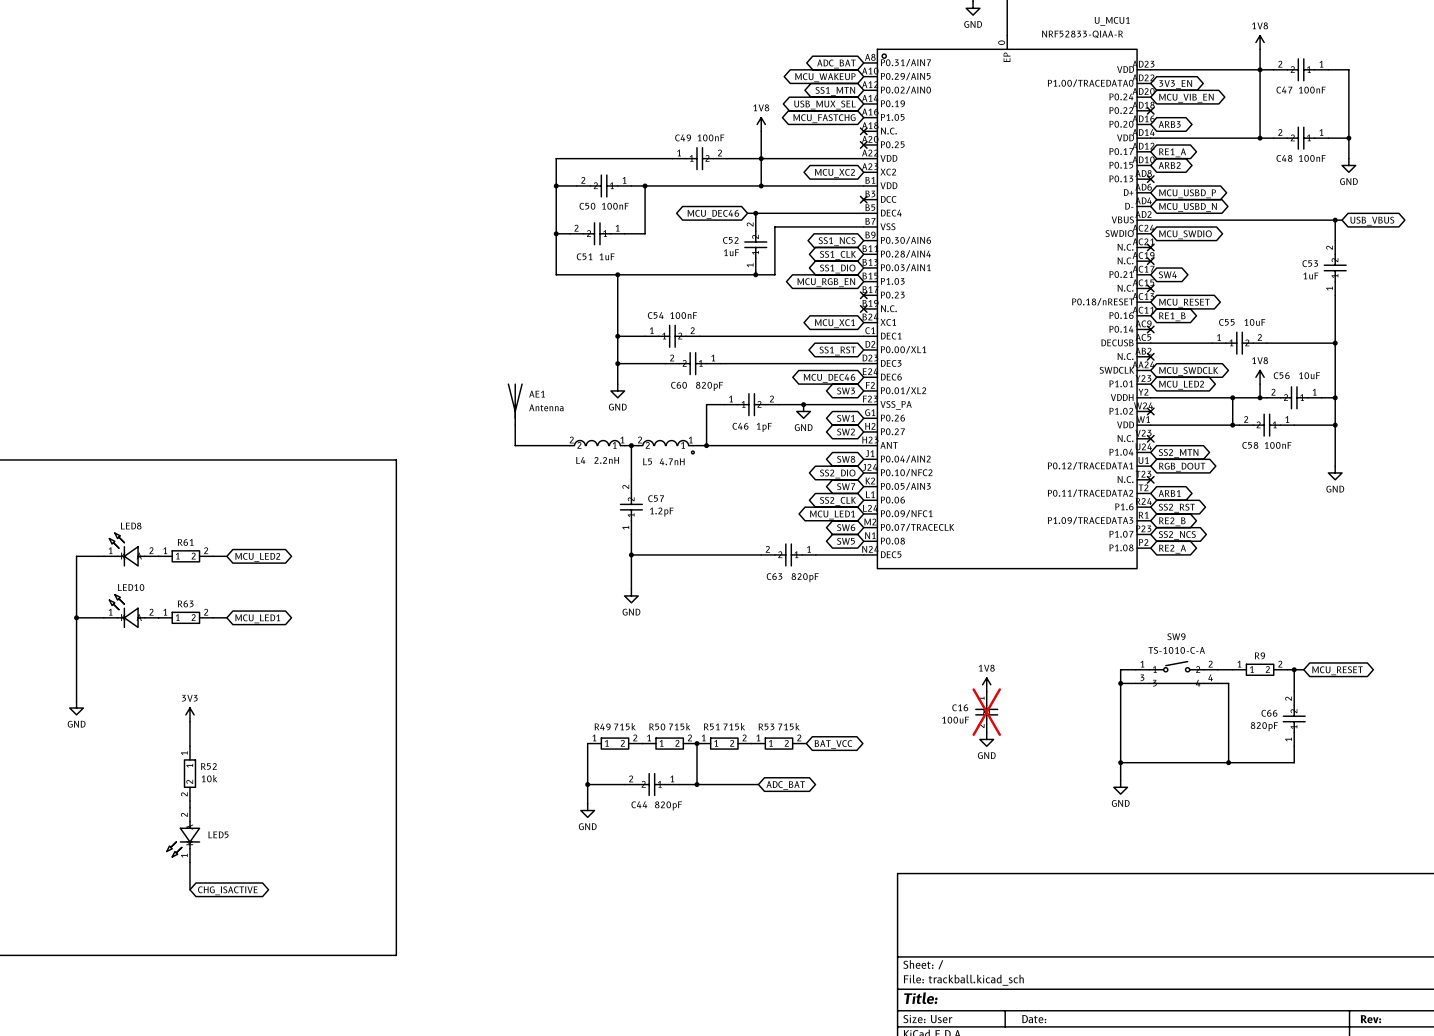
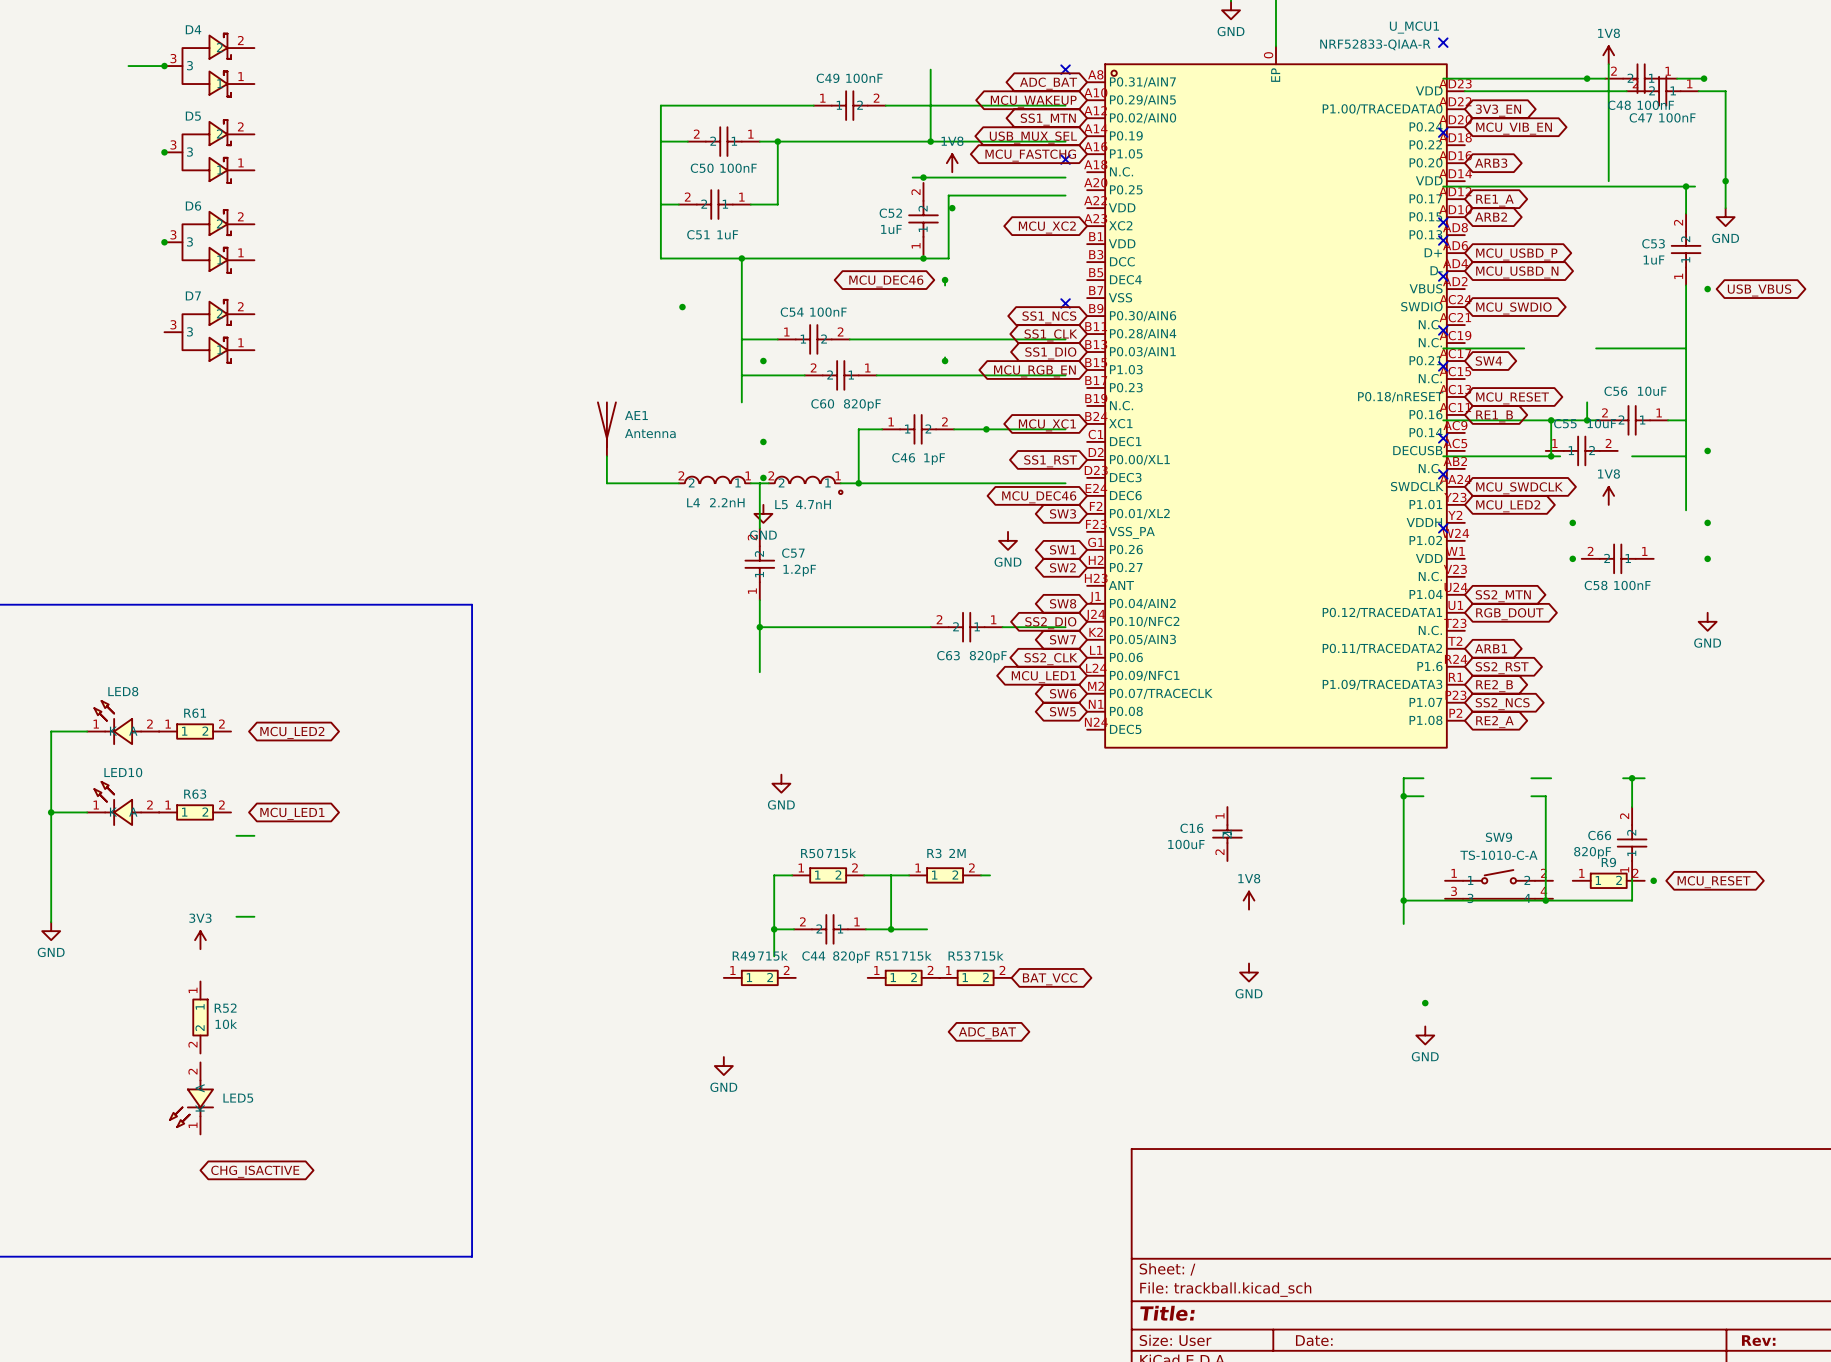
no-connect mark: none -> (1443, 42)
D4: none -> (209, 65)
wire: none -> (128, 66) (164, 66)
junction: none -> (164, 66)
no-connect mark: none -> (1065, 69)
junction: none -> (1704, 78)
junction position: (1260, 69) -> (1587, 78)
junction: none -> (777, 141)
junction: none -> (930, 141)
no-connect mark position: (1150, 110) -> (1443, 132)
D5: none -> (209, 151)
junction: none -> (164, 152)
no-connect mark: none -> (1065, 159)
wire: (761, 131) (761, 185) -> (930, 69) (930, 141)
no-connect mark: (863, 131) -> none
junction: none -> (923, 177)
wire: (1150, 138) (1273, 138) -> (1443, 78) (1605, 78)
junction: (1260, 138) -> none
C48 position: (1301, 138) -> (1641, 78)
wire: (1328, 138) (1348, 138) -> (1677, 78) (1704, 78)
junction: none -> (1686, 186)
no-connect mark: (863, 144) -> none
wire: (672, 158) (556, 158) (556, 274) (774, 274) (774, 226) (863, 226) -> (813, 105) (660, 105) (660, 258) (948, 258) (948, 195) (1065, 195)
C49 position: (699, 158) -> (849, 105)
wire: (727, 158) (863, 158) -> (885, 105) (1065, 105)
no-connect mark: none -> (1443, 222)
no-connect mark: (1150, 179) -> none
D6: none -> (209, 241)
no-connect mark: none -> (1443, 240)
junction: none -> (164, 242)
wire: (556, 185) (576, 185) -> (660, 141) (687, 141)
junction: (556, 185) -> none
C50 position: (604, 185) -> (723, 141)
wire: (631, 185) (863, 185) -> (759, 141) (1065, 141)
wire: (645, 185) (645, 233) (624, 233) -> (777, 141) (777, 204) (750, 204)
junction: (645, 185) -> none
junction position: (761, 185) -> (923, 258)
junction: none -> (741, 258)
no-connect mark: (863, 199) -> none
no-connect mark: none -> (1443, 276)
wire: (747, 213) (863, 213) -> (912, 177) (1065, 177)
wire: (1150, 220) (1342, 220) -> (1443, 186) (1695, 186)
wire: (1335, 220) (1335, 240) -> (1686, 186) (1686, 213)
no-connect mark: none -> (1065, 303)
wire: (556, 233) (569, 233) -> (660, 204) (678, 204)
C51 position: (597, 233) -> (714, 204)
C52 position: (755, 244) -> (923, 218)
no-connect mark: (1150, 247) -> none
no-connect mark: none -> (1443, 330)
D7: none -> (209, 331)
no-connect mark: (1150, 261) -> none
C53 position: (1335, 267) -> (1686, 249)
wire: (617, 274) (617, 384) -> (741, 258) (741, 402)
no-connect mark: none -> (1443, 366)
no-connect mark: (1150, 288) -> none
no-connect mark: (863, 295) -> none
wire: (1335, 295) (1335, 466) -> (1686, 285) (1686, 510)
no-connect mark: (863, 308) -> none
junction: none -> (1551, 420)
junction: none -> (1587, 420)
junction: none -> (986, 429)
no-connect mark: (1150, 329) -> none
no-connect mark: none -> (1443, 438)
wire: (617, 336) (645, 336) -> (741, 339) (777, 339)
C54 position: (672, 336) -> (813, 339)
wire: (699, 336) (863, 336) -> (849, 339) (1065, 339)
wire: (1150, 343) (1212, 343) -> (1443, 348) (1524, 348)
wire: (1266, 343) (1335, 343) -> (1596, 348) (1686, 348)
junction: none -> (1551, 456)
no-connect mark: (1150, 356) -> none
no-connect mark: none -> (1443, 474)
wire: (617, 363) (665, 363) -> (741, 375) (804, 375)
C60 position: (692, 363) -> (840, 375)
wire: (720, 363) (863, 363) -> (876, 375) (1065, 375)
junction: none -> (858, 483)
wire: (1260, 384) (1260, 397) -> (1587, 402) (1587, 420)
wire: (1150, 397) (1266, 397) -> (1443, 420) (1596, 420)
wire: (1232, 397) (1232, 425) -> (1551, 420) (1551, 456)
junction: (1260, 397) -> none
C56 position: (1294, 397) -> (1632, 420)
wire: (1321, 397) (1335, 397) -> (1668, 420) (1686, 420)
AE1 position: (515, 404) -> (606, 428)
wire: (724, 404) (706, 404) (706, 445) -> (882, 429) (858, 429) (858, 483)
C46 position: (751, 404) -> (918, 429)
wire: (779, 404) (863, 404) -> (954, 429) (1065, 429)
junction: (803, 404) -> none
no-connect mark position: (1150, 411) -> (1443, 528)
wire: (515, 425) (515, 445) (569, 445) -> (606, 456) (606, 483) (678, 483)
wire: (1150, 425) (1239, 425) -> (1443, 456) (1560, 456)
wire: (1294, 425) (1335, 425) -> (1632, 456) (1686, 456)
no-connect mark: (1150, 438) -> none
L4 position: (597, 443) -> (714, 479)
wire: (624, 445) (638, 445) -> (750, 483) (768, 483)
wire: (631, 445) (631, 479) -> (759, 483) (759, 528)
junction: (631, 445) -> none
wire: (692, 445) (863, 445) -> (840, 483) (1065, 483)
junction: (706, 445) -> none
L5 position: (666, 447) -> (805, 485)
junction: none -> (759, 627)
no-connect mark: (1150, 479) -> none
C57 position: (631, 507) -> (759, 564)
wire: (631, 534) (631, 589) -> (759, 600) (759, 672)
wire: (631, 554) (761, 554) -> (759, 627) (930, 627)
junction: (631, 554) -> none
C63 position: (788, 554) -> (966, 627)
wire: (815, 554) (863, 554) -> (1002, 627) (1065, 627)
wire: (213, 556) (226, 556) -> (236, 835) (254, 835)
junction: none -> (1632, 778)
junction: none -> (1403, 796)
wire: (213, 617) (226, 617) -> (236, 916) (254, 916)
wire: none -> (792, 875) (774, 875) (774, 956)
wire: none -> (864, 875) (909, 875)
R3: none -> (945, 875)
wire: none -> (981, 875) (990, 875)
wire: (1135, 669) (1120, 669) (1120, 780) -> (1423, 778) (1403, 778) (1403, 923)
wire: (1217, 669) (1232, 669) -> (1531, 778) (1551, 778)
wire: (1287, 669) (1303, 669) -> (1623, 778) (1644, 778)
wire: (1294, 669) (1294, 691) -> (1632, 778) (1632, 807)
wire: (1120, 683) (1135, 683) -> (1403, 796) (1423, 796)
junction position: (1120, 683) -> (1403, 900)
wire: (1217, 683) (1228, 683) (1228, 762) -> (1531, 796) (1545, 796) (1545, 900)
junction: none -> (1545, 900)
wire: none -> (774, 929) (793, 929)
junction: none -> (774, 929)
wire: none -> (865, 929) (927, 929)
junction: none -> (891, 929)
C16 position: (986, 712) -> (1227, 834)
C16 do-not-place cross: (986, 712) -> none
C66 position: (1294, 718) -> (1632, 843)
wire: (189, 721) (189, 746) -> none
wire: (587, 743) (587, 803) -> none
R50 position: (669, 743) -> (828, 875)
wire: (697, 743) (697, 784) -> (891, 875) (891, 929)
junction: (697, 743) -> none
wire: (1294, 746) (1294, 762) (1120, 762) -> (1632, 879) (1632, 900) (1403, 900)
junction: (1228, 762) -> none
wire: (587, 784) (624, 784) -> none
junction: (587, 784) -> none
C44 position: (651, 784) -> (829, 929)
wire: (679, 784) (758, 784) -> none
junction: (697, 784) -> none
wire: (189, 800) (189, 807) -> none
wire: (189, 862) (189, 889) -> none

